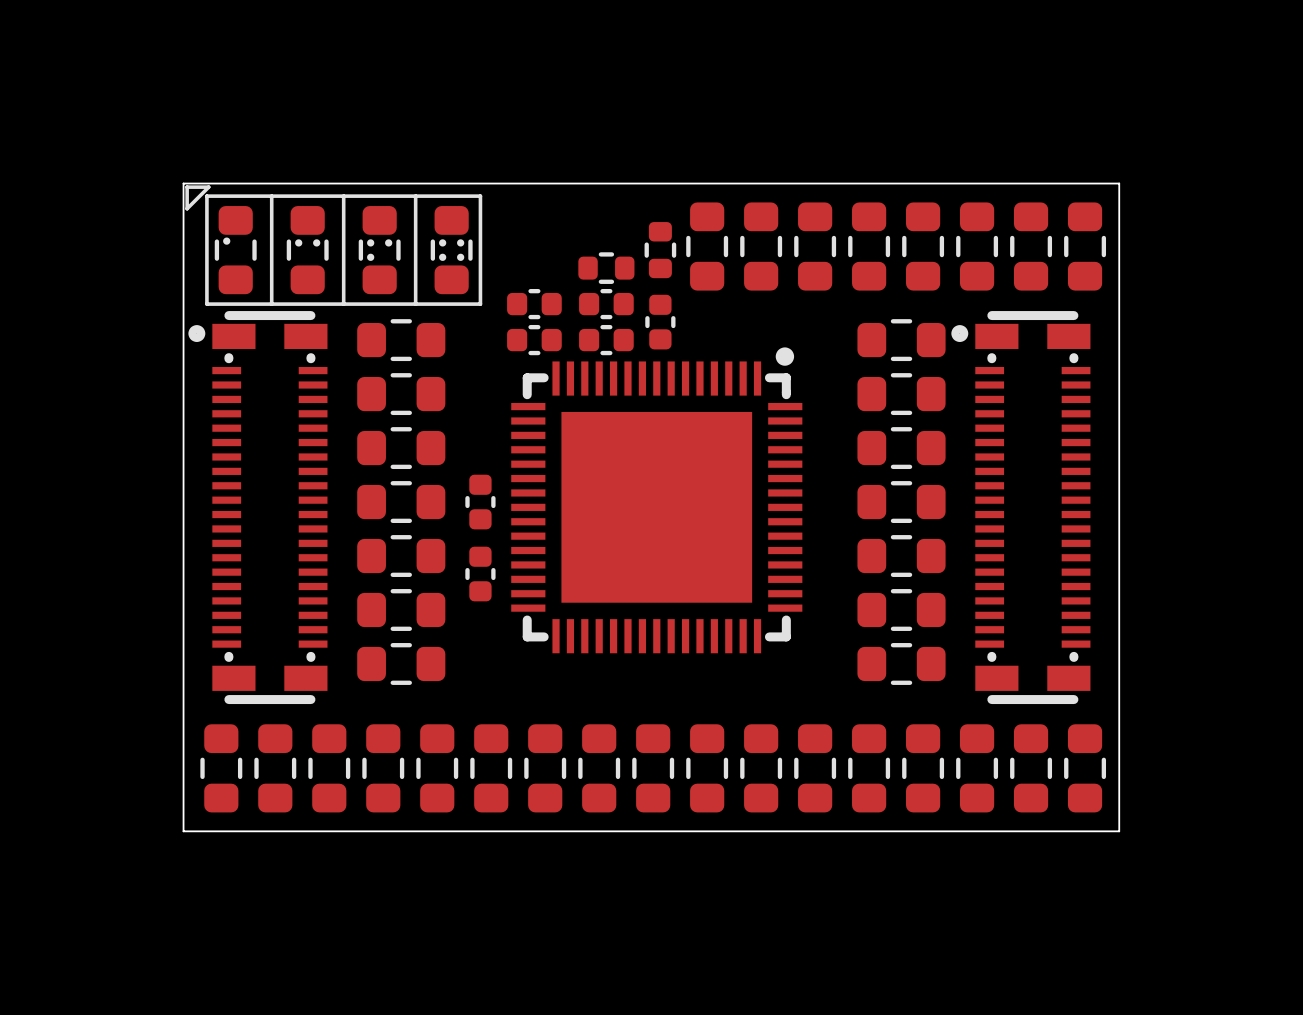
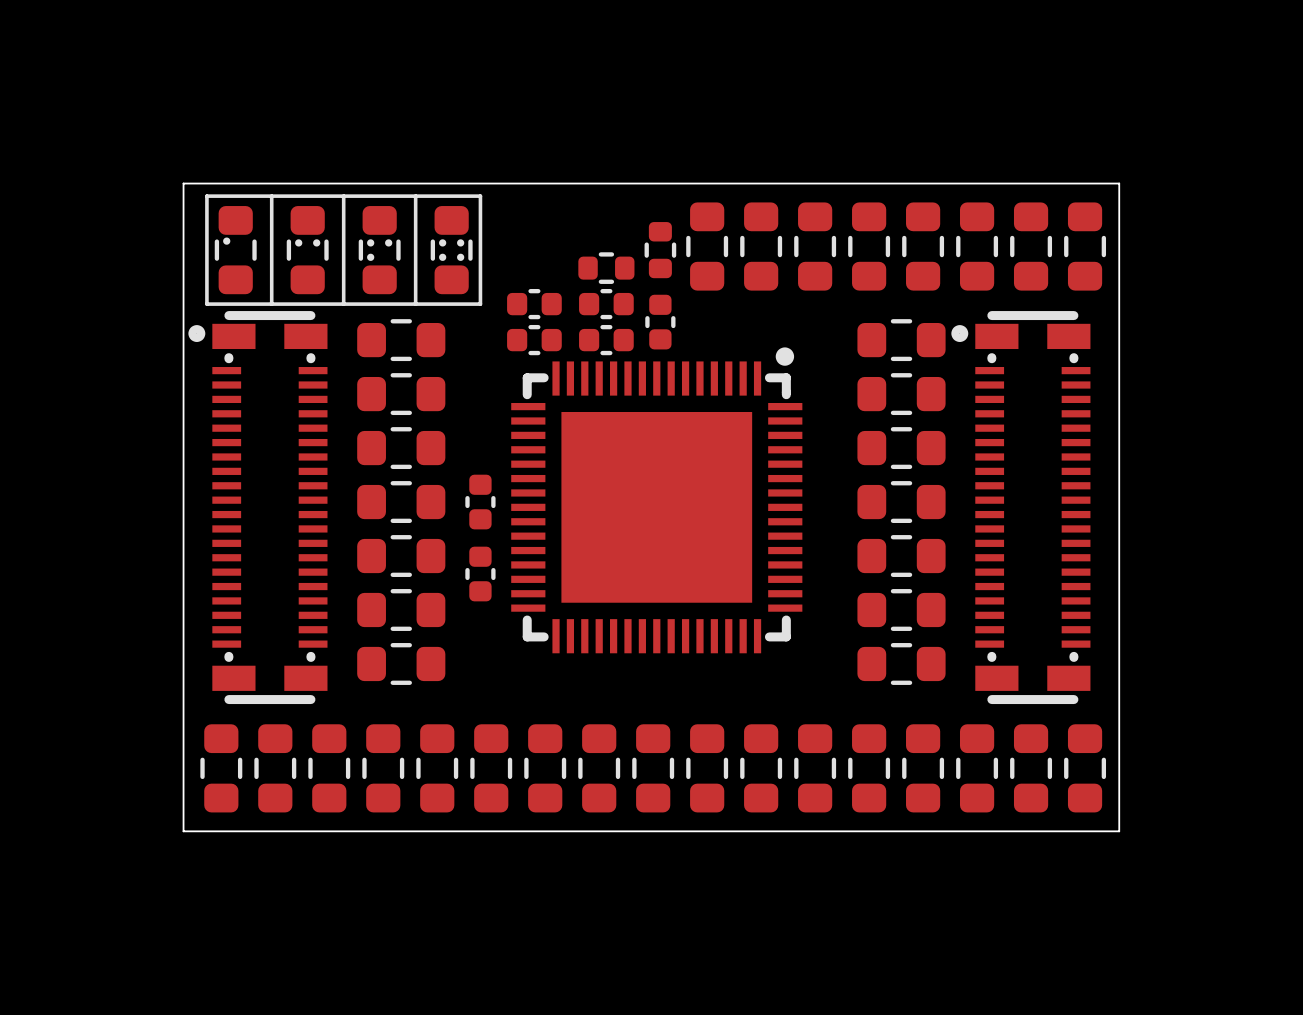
line: (187, 187) (208, 187) (187, 208) (187, 187) -> none

